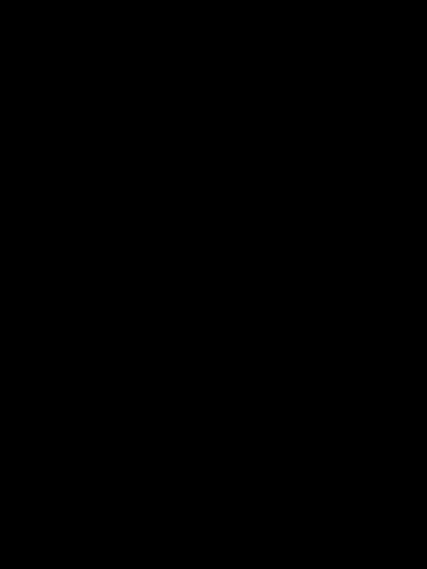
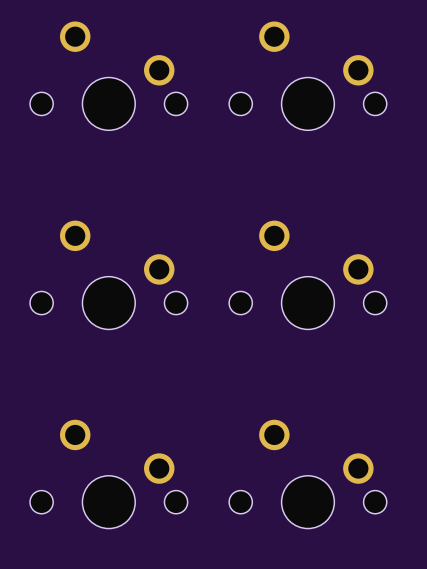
part: none -> (108, 75)
part: none -> (307, 75)
part: none -> (108, 275)
part: none -> (307, 275)
part: none -> (108, 474)
part: none -> (307, 474)

